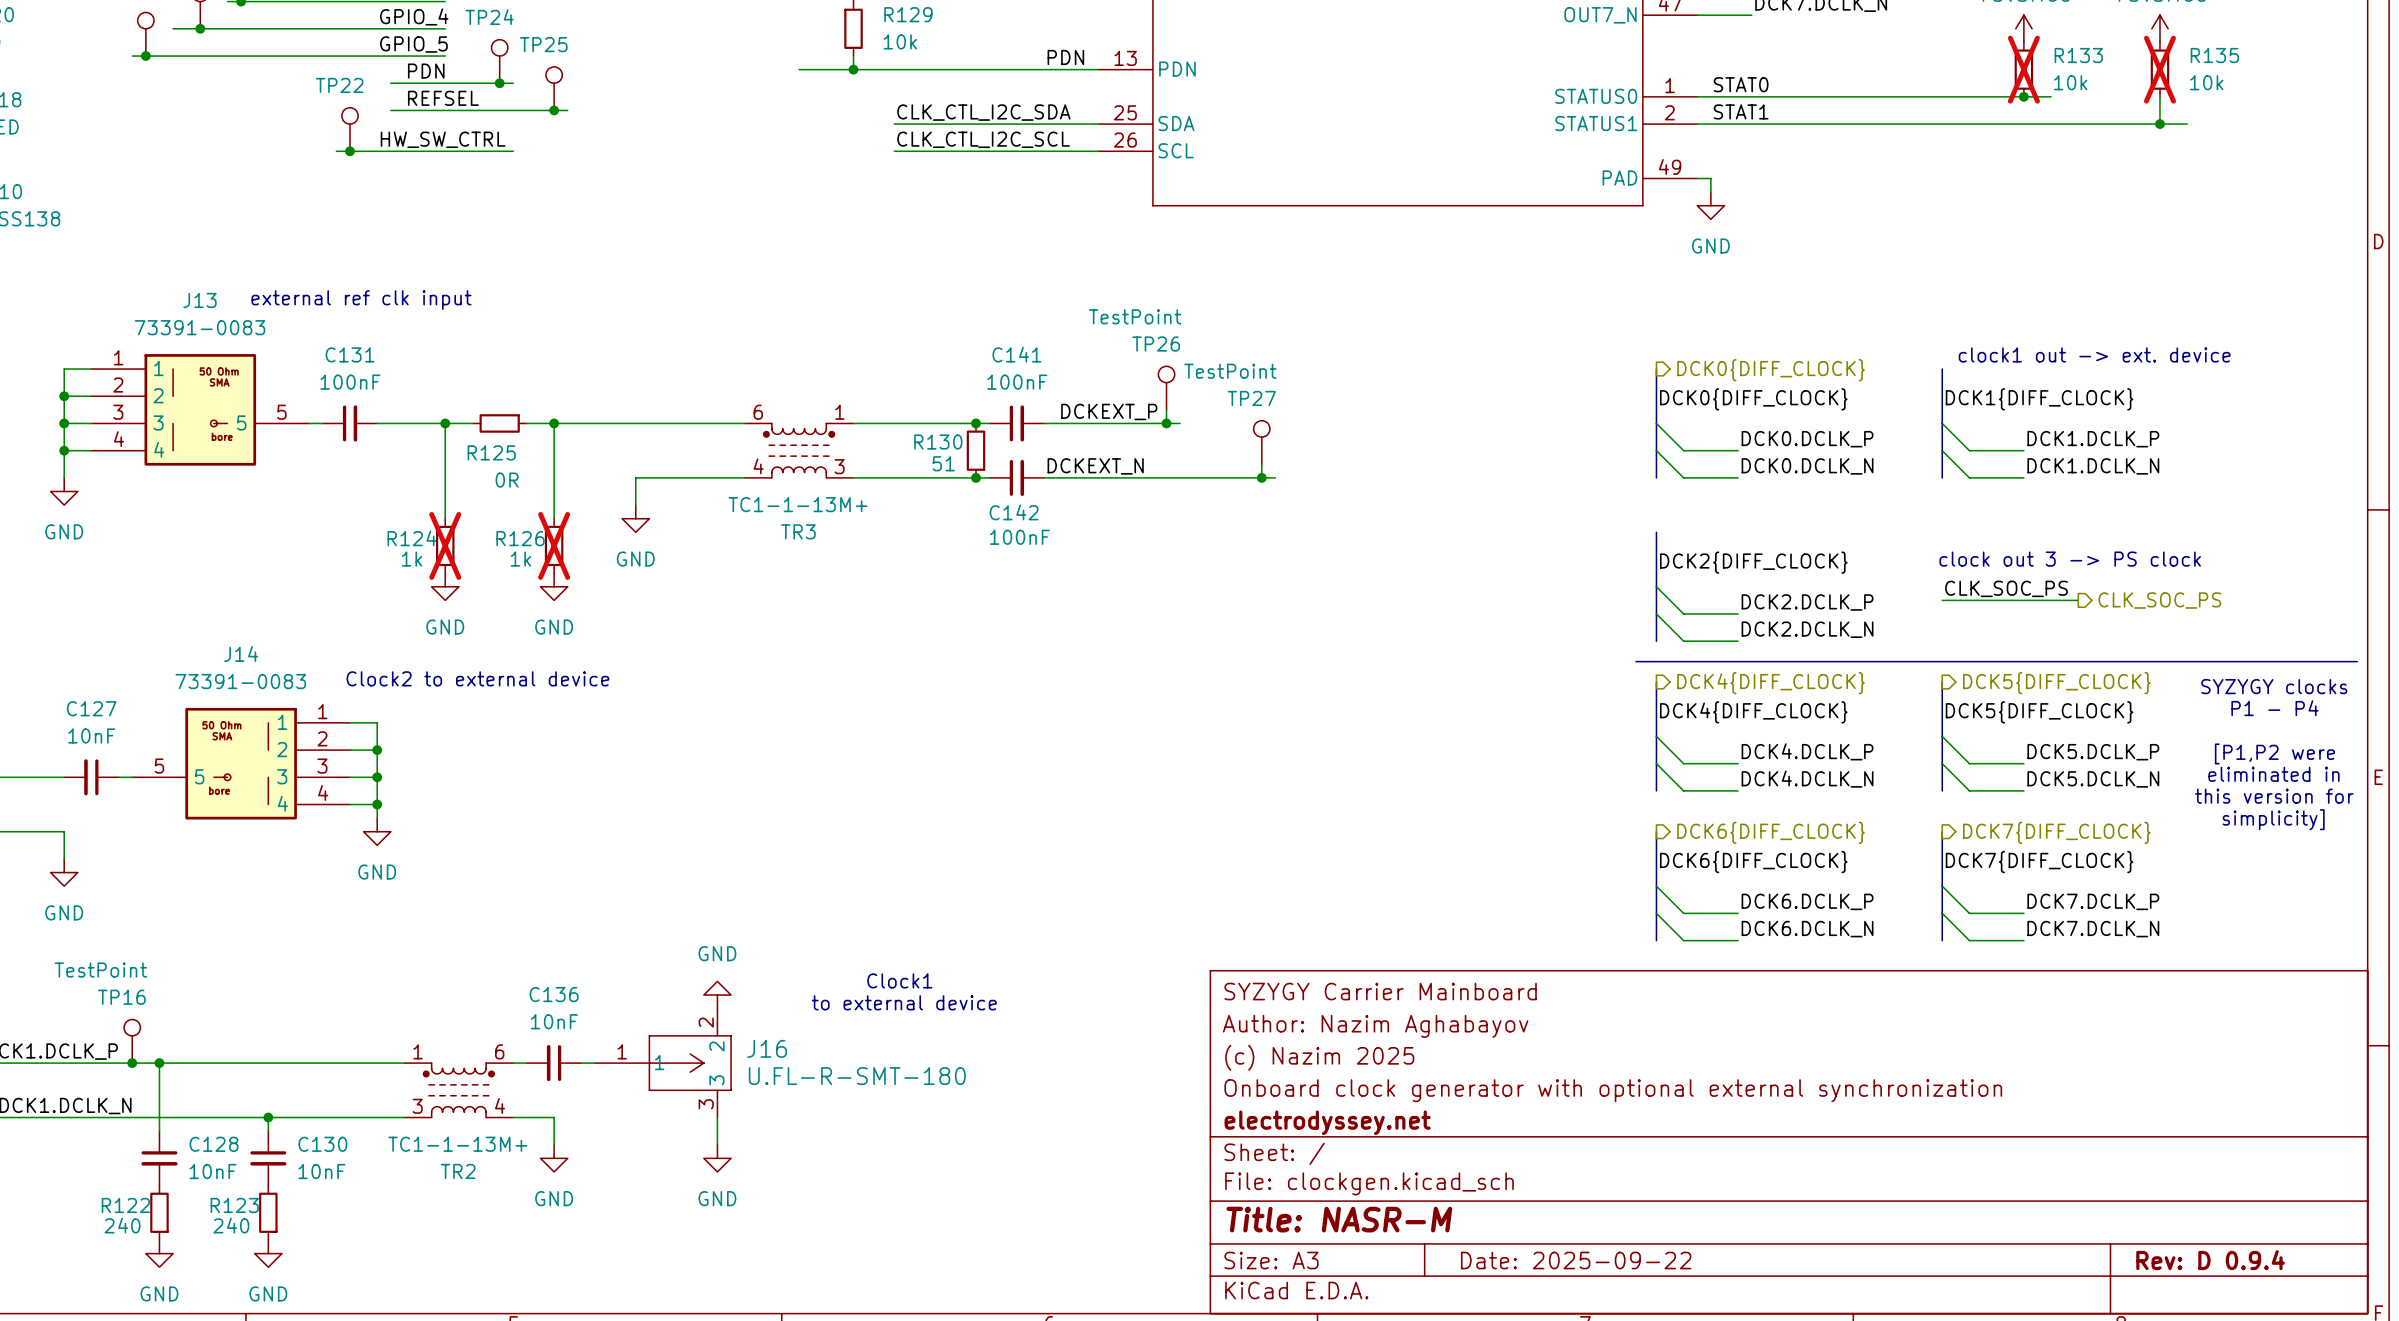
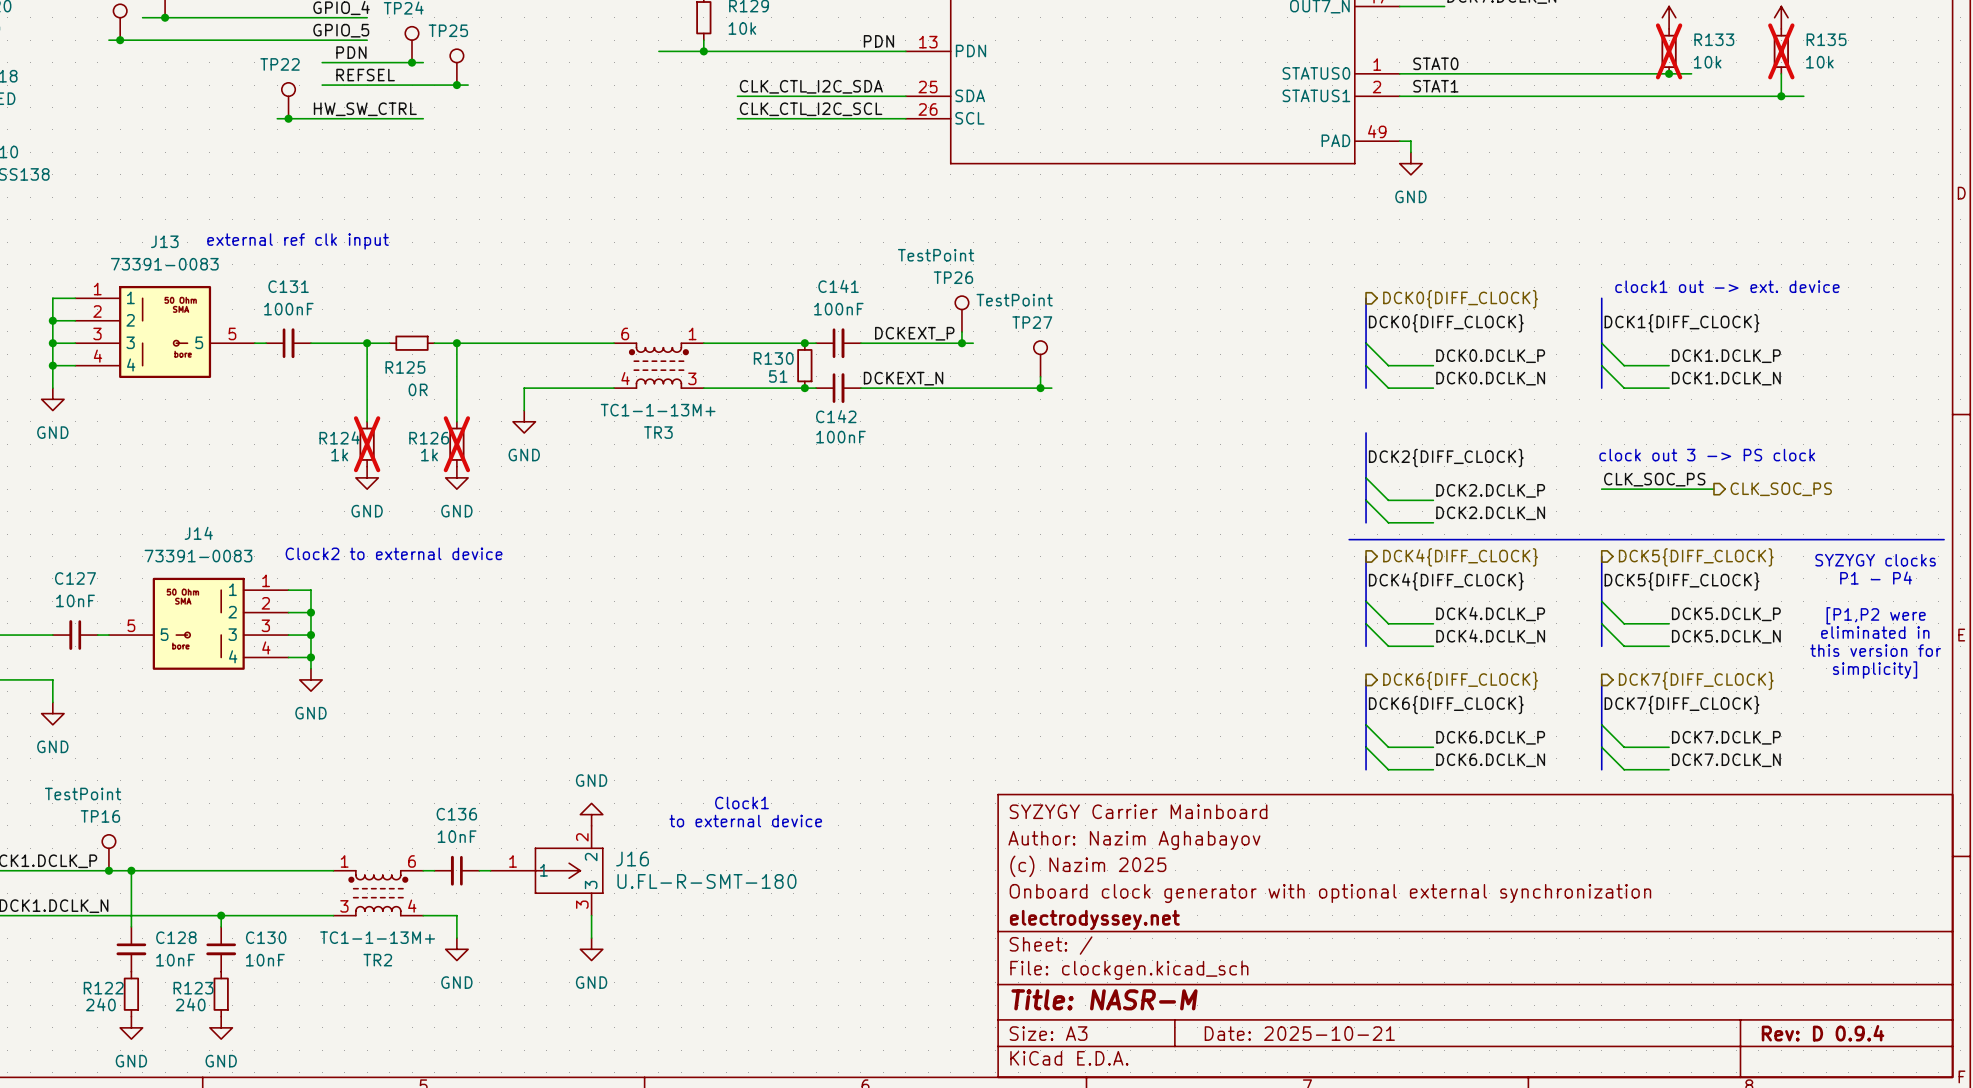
title block: Date: 2025-09-22 (1576, 1260) -> Date: 2025-10-21 (1299, 1033)

